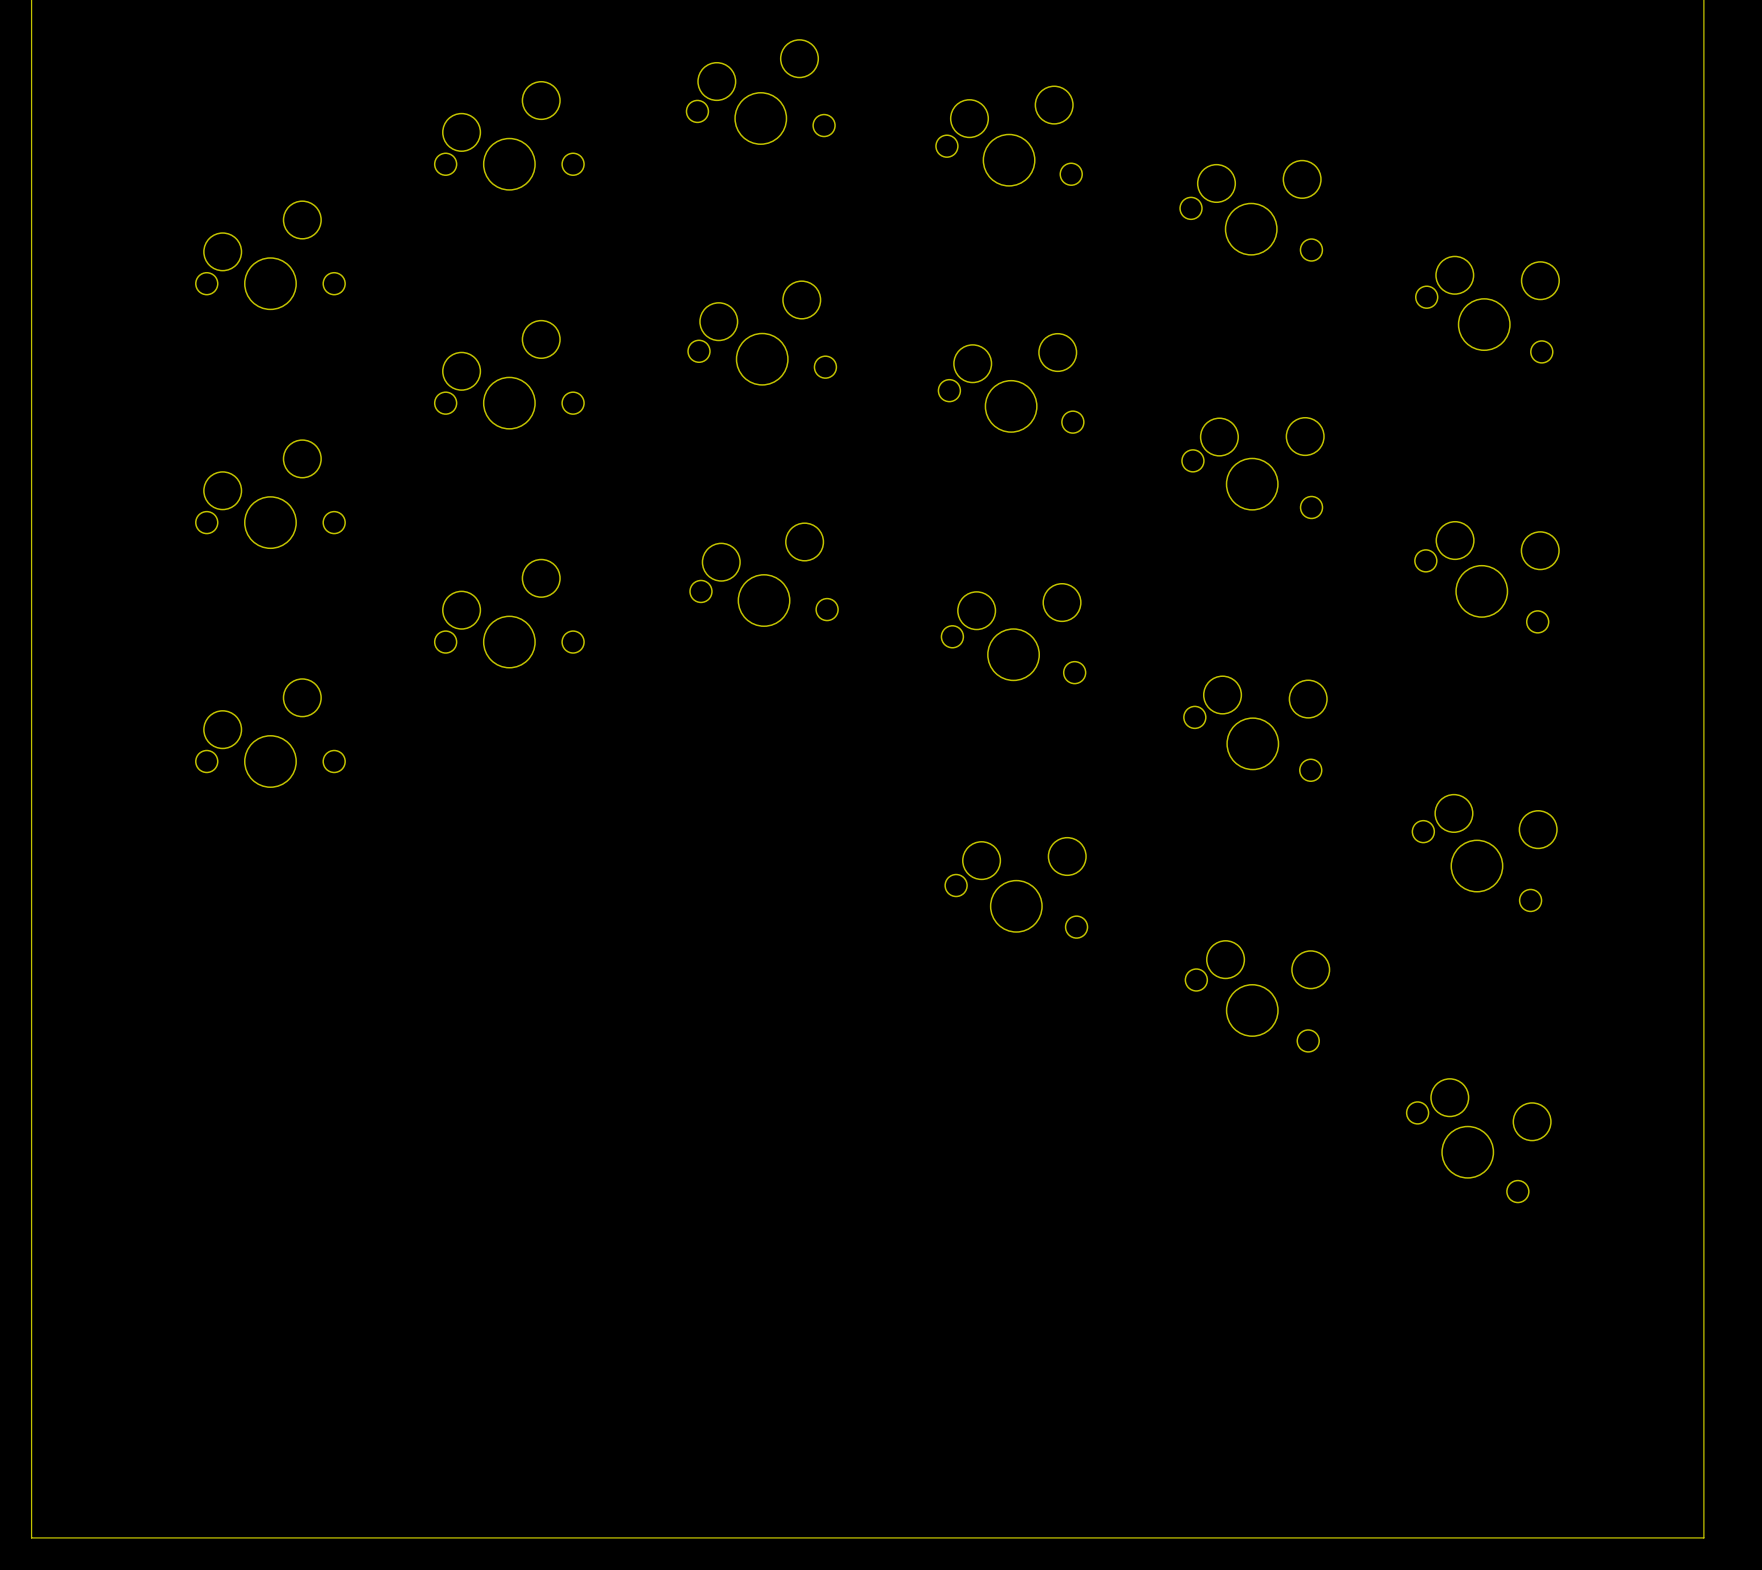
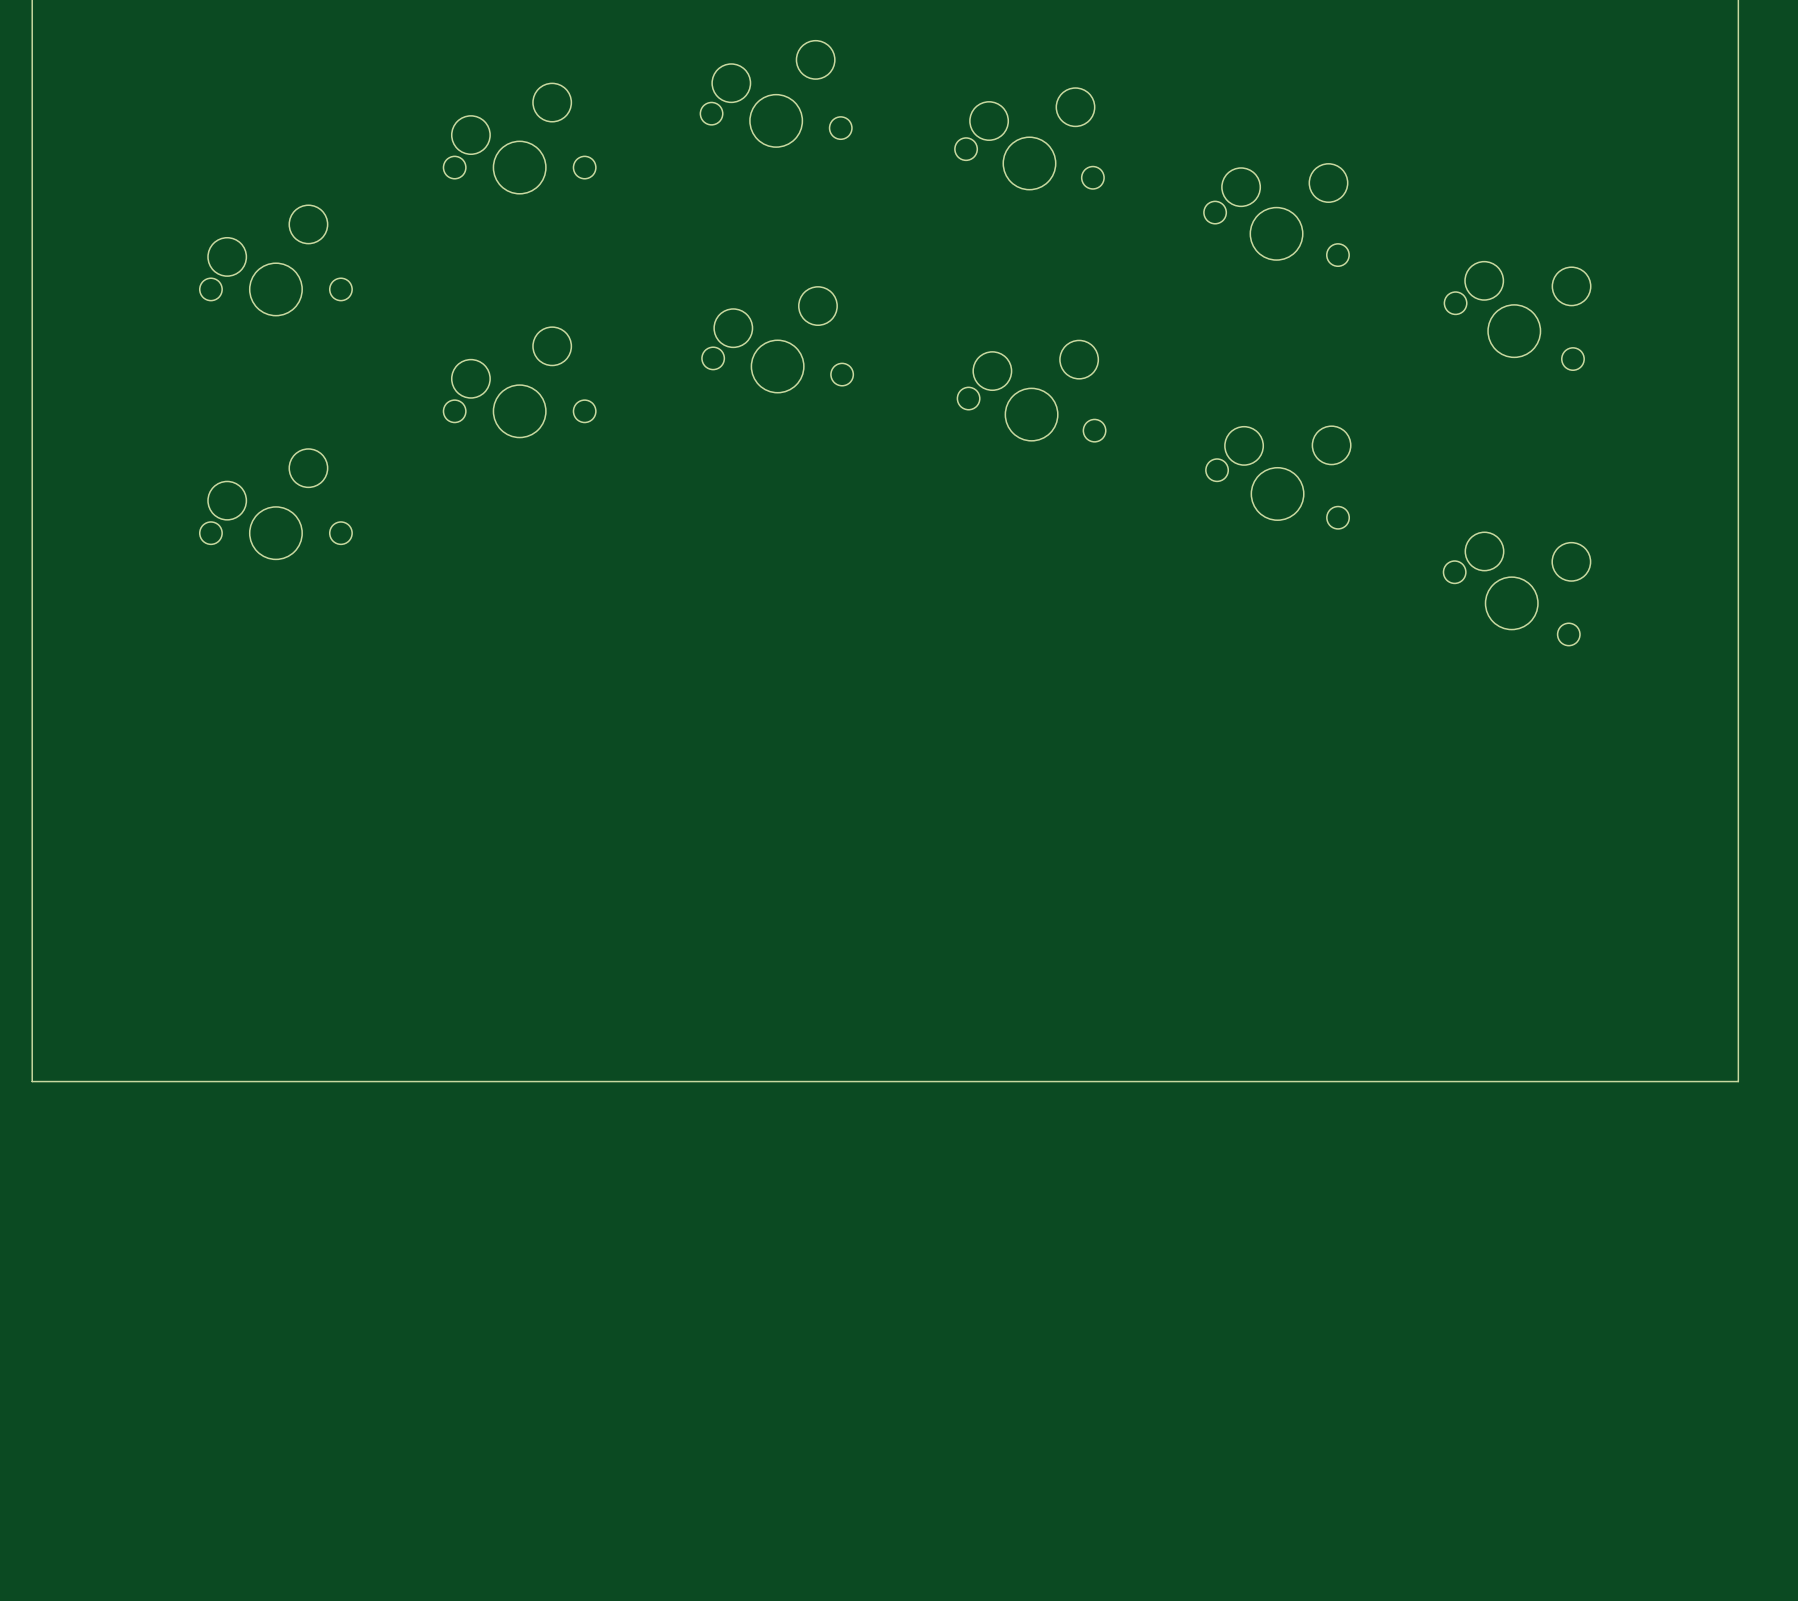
part: (764, 574) -> none
part: (509, 613) -> none
part: (1013, 633) -> none
part: (1255, 728) -> none
part: (270, 733) -> none
part: (1484, 853) -> none
part: (1016, 887) -> none
part: (1257, 996) -> none
board edge: (31, 1060) (31, 1537) (1703, 1537) (1703, 1060) -> (32, 1081) (1738, 1081)
part: (1478, 1140) -> none

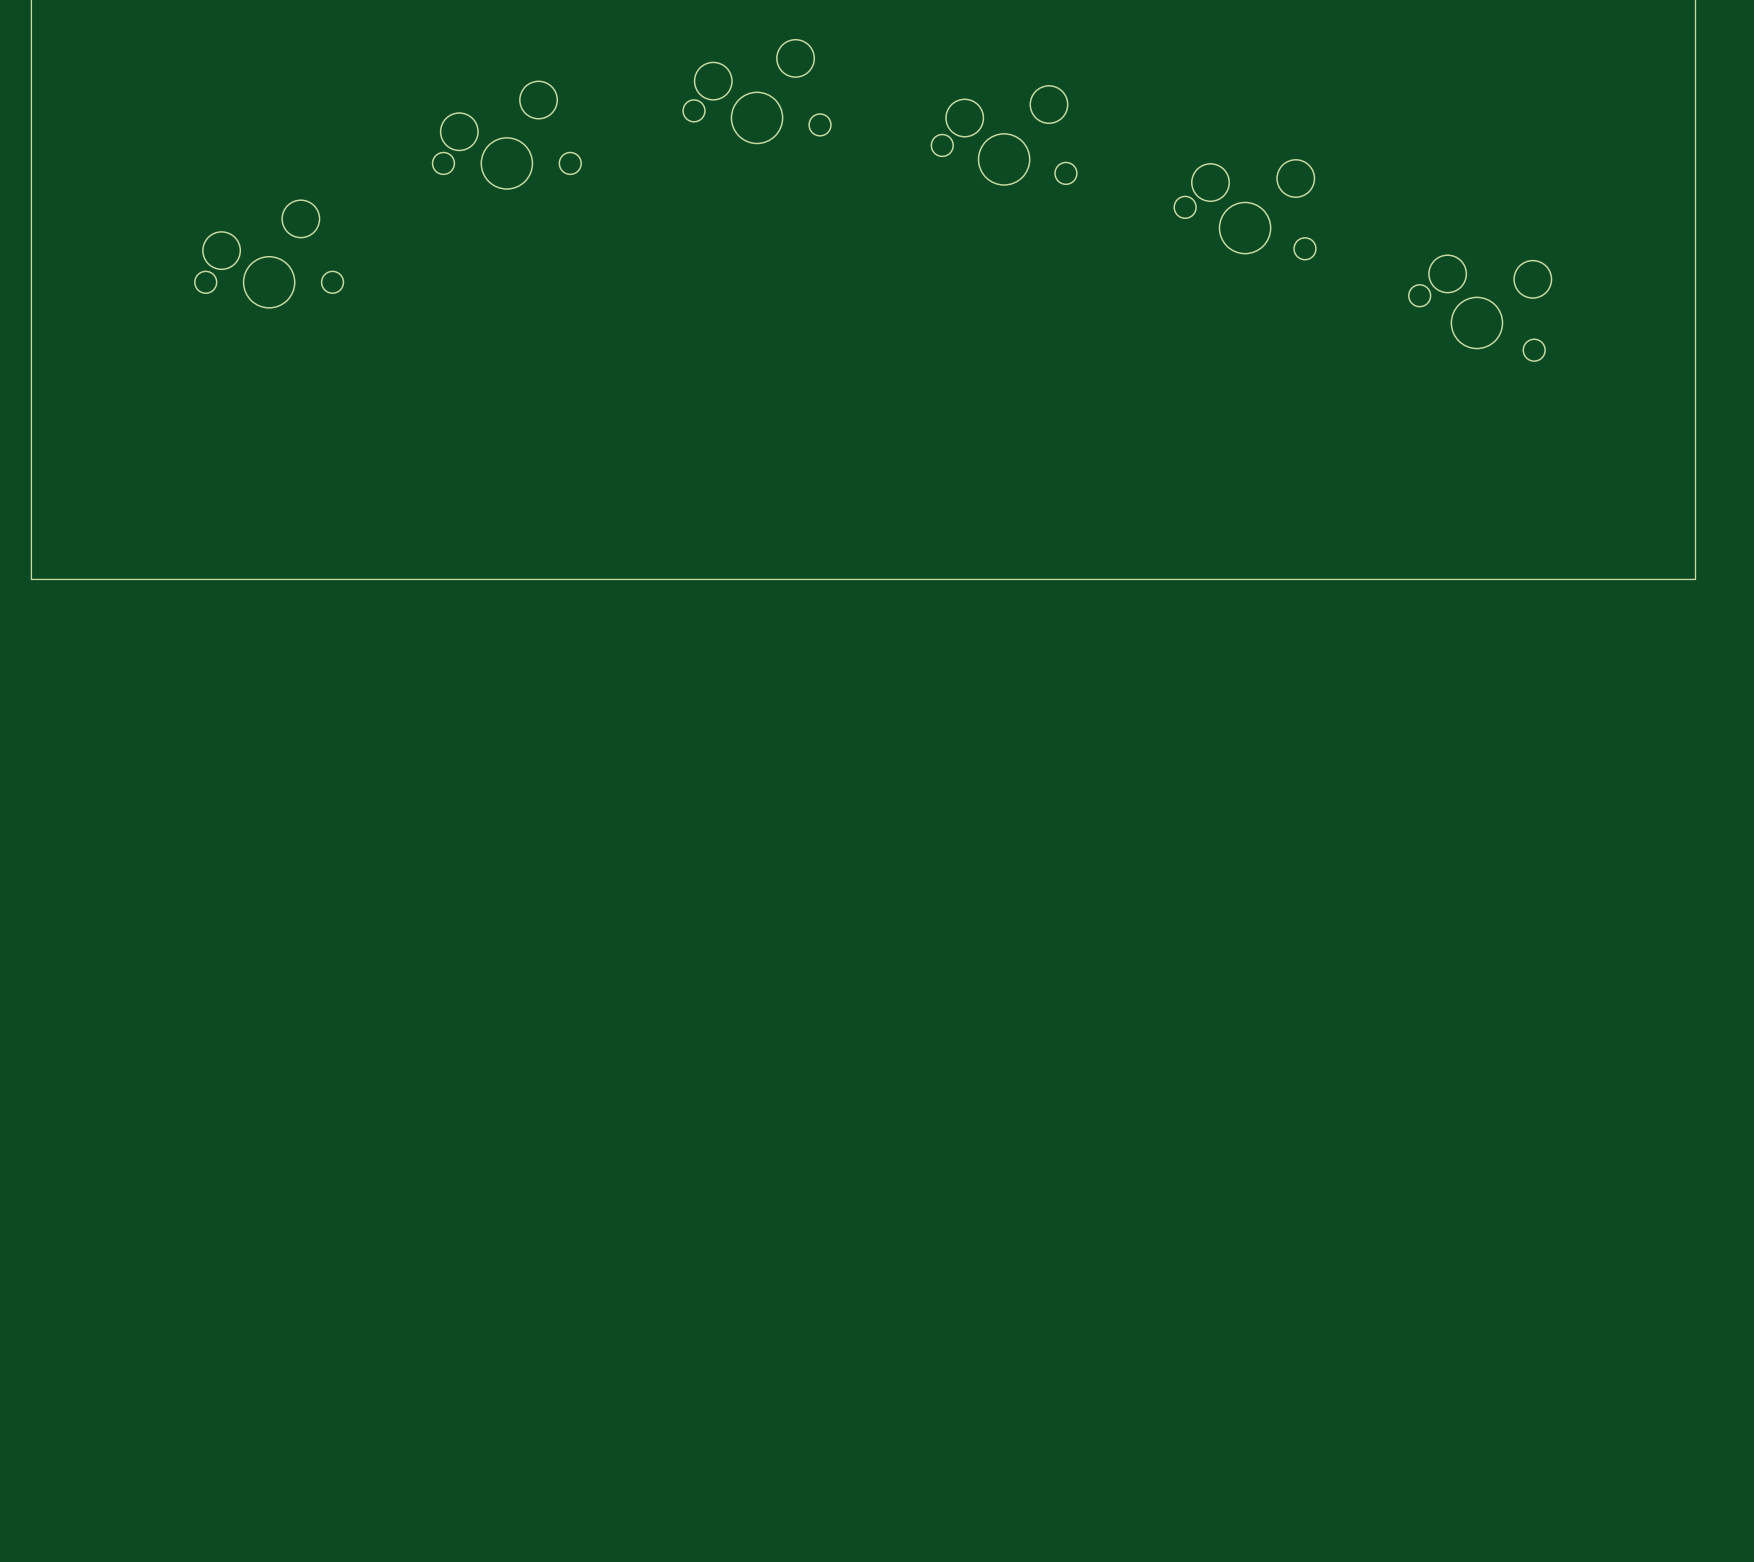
part: (777, 339) -> none
part: (519, 382) -> none
part: (1031, 391) -> none
part: (1278, 477) -> none
part: (275, 504) -> none
part: (1517, 588) -> none
board edge: (32, 594) (32, 1081) (1738, 1081) (1738, 594) -> (31, 579) (1695, 579)

